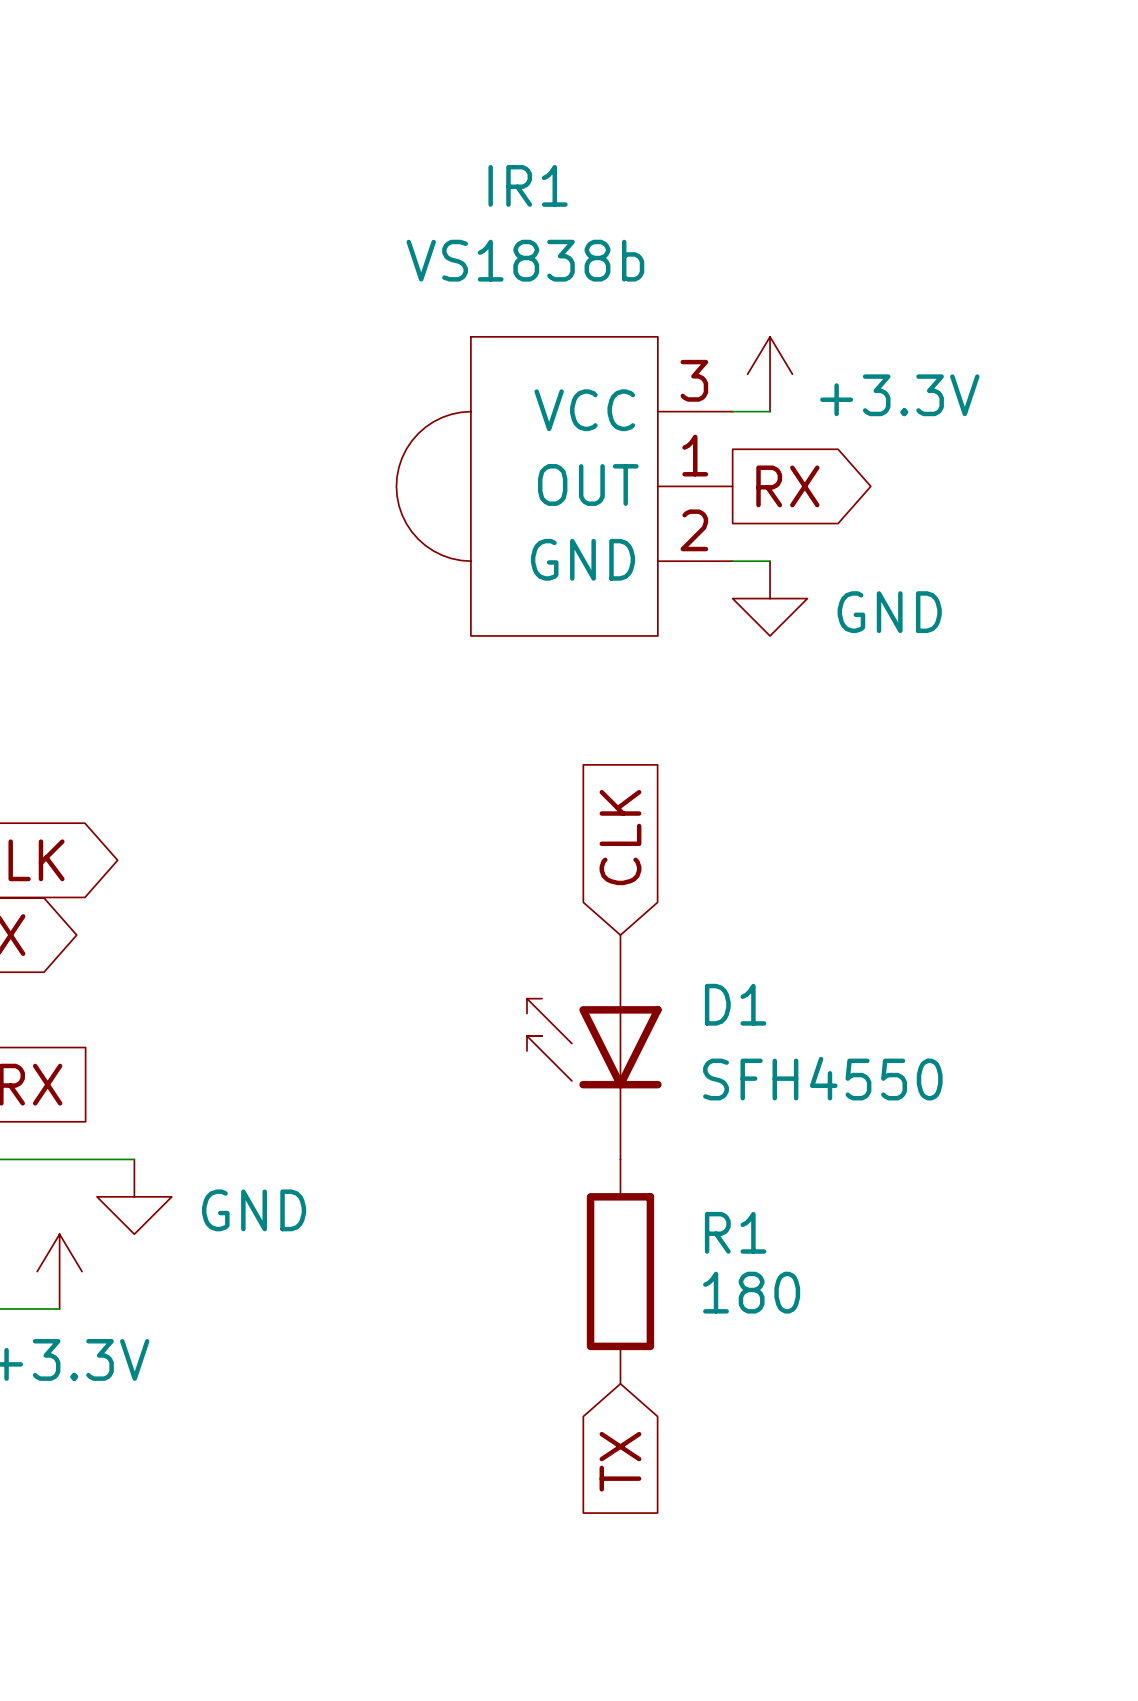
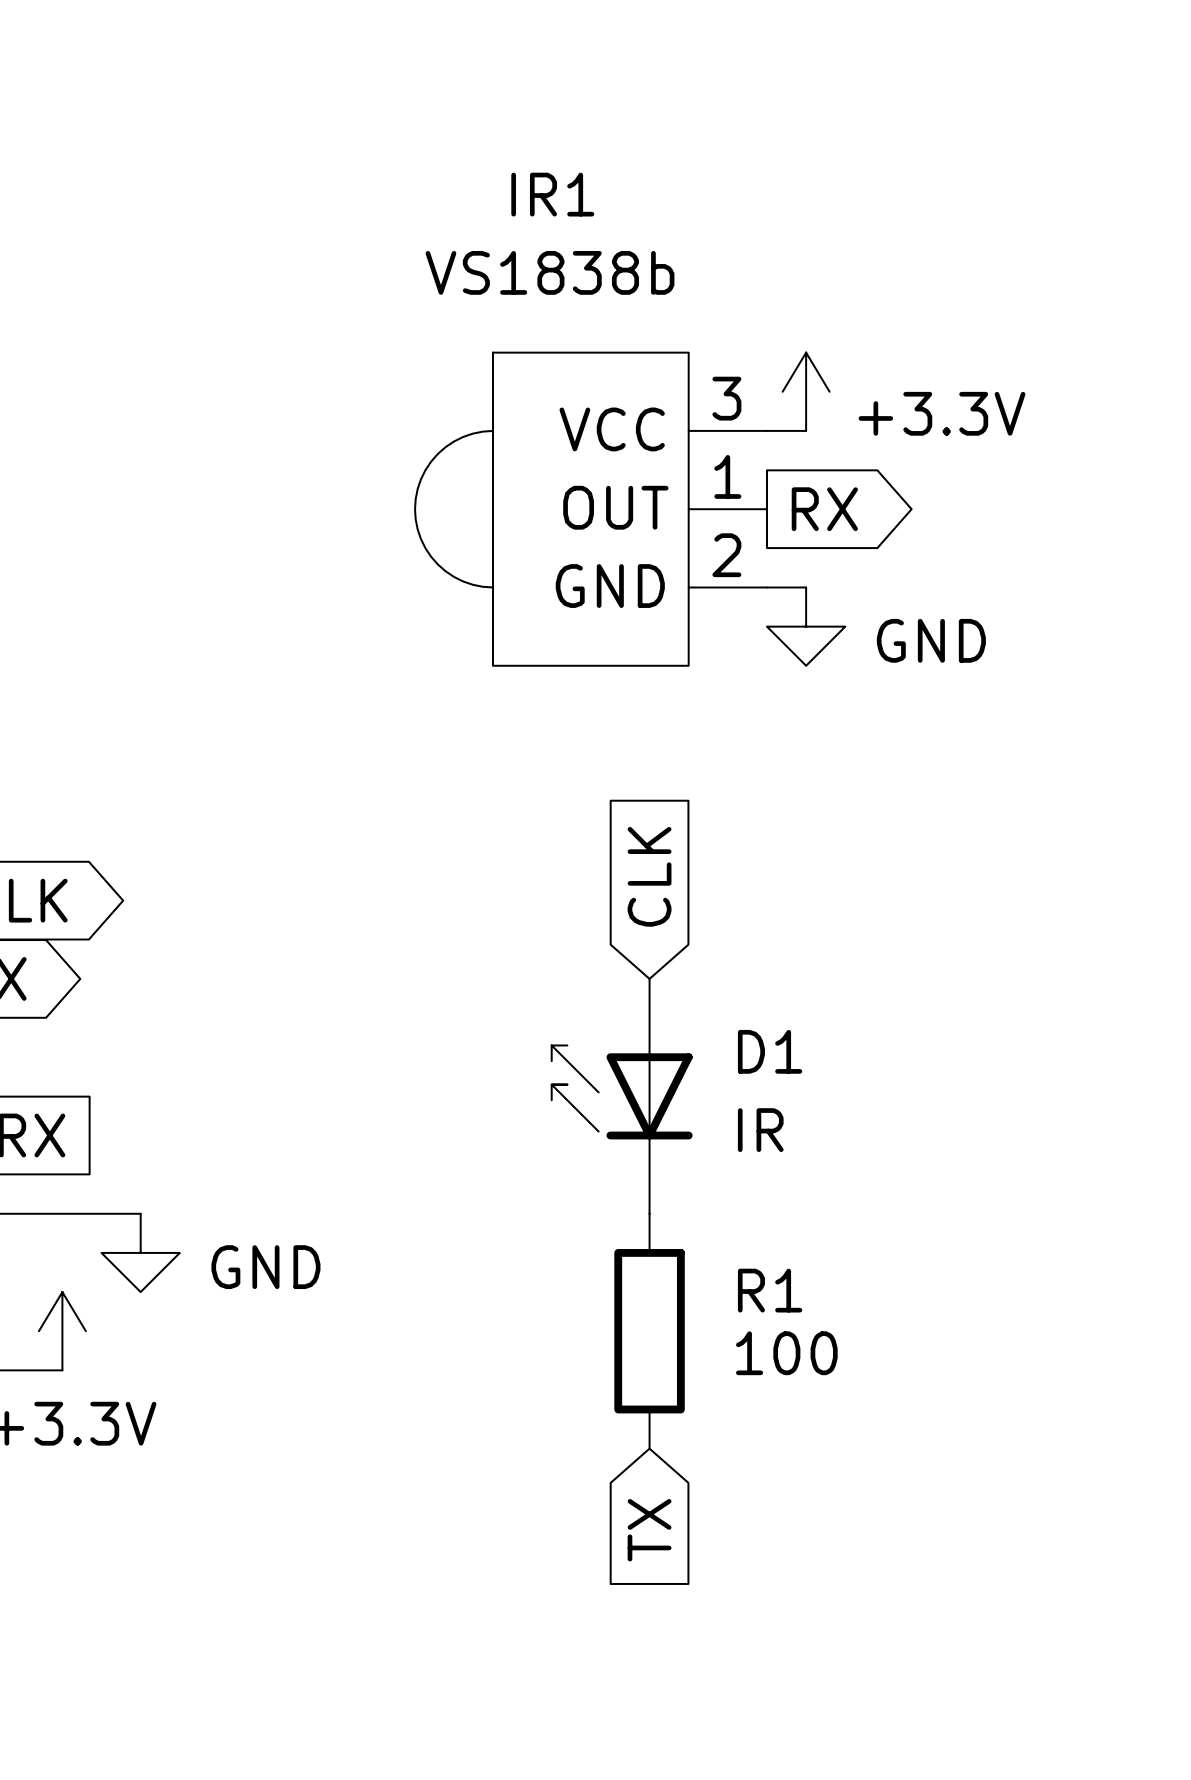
D1 value: SFH4550 (822, 1078) -> IR (760, 1130)
R1 value: 180 (751, 1292) -> 100 (786, 1353)

